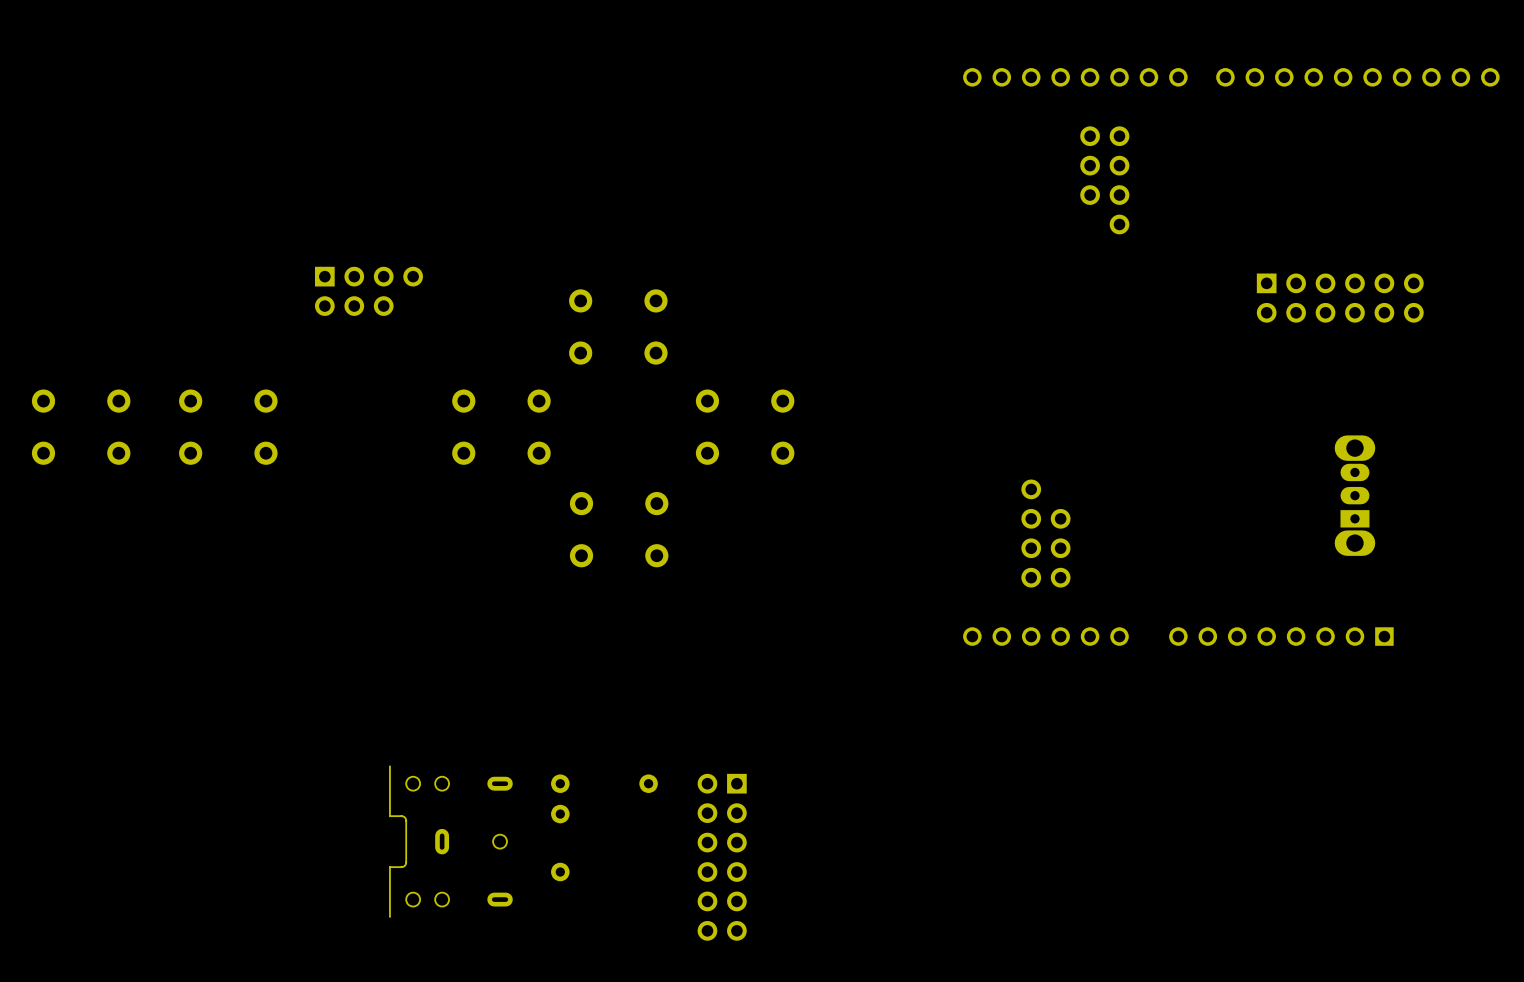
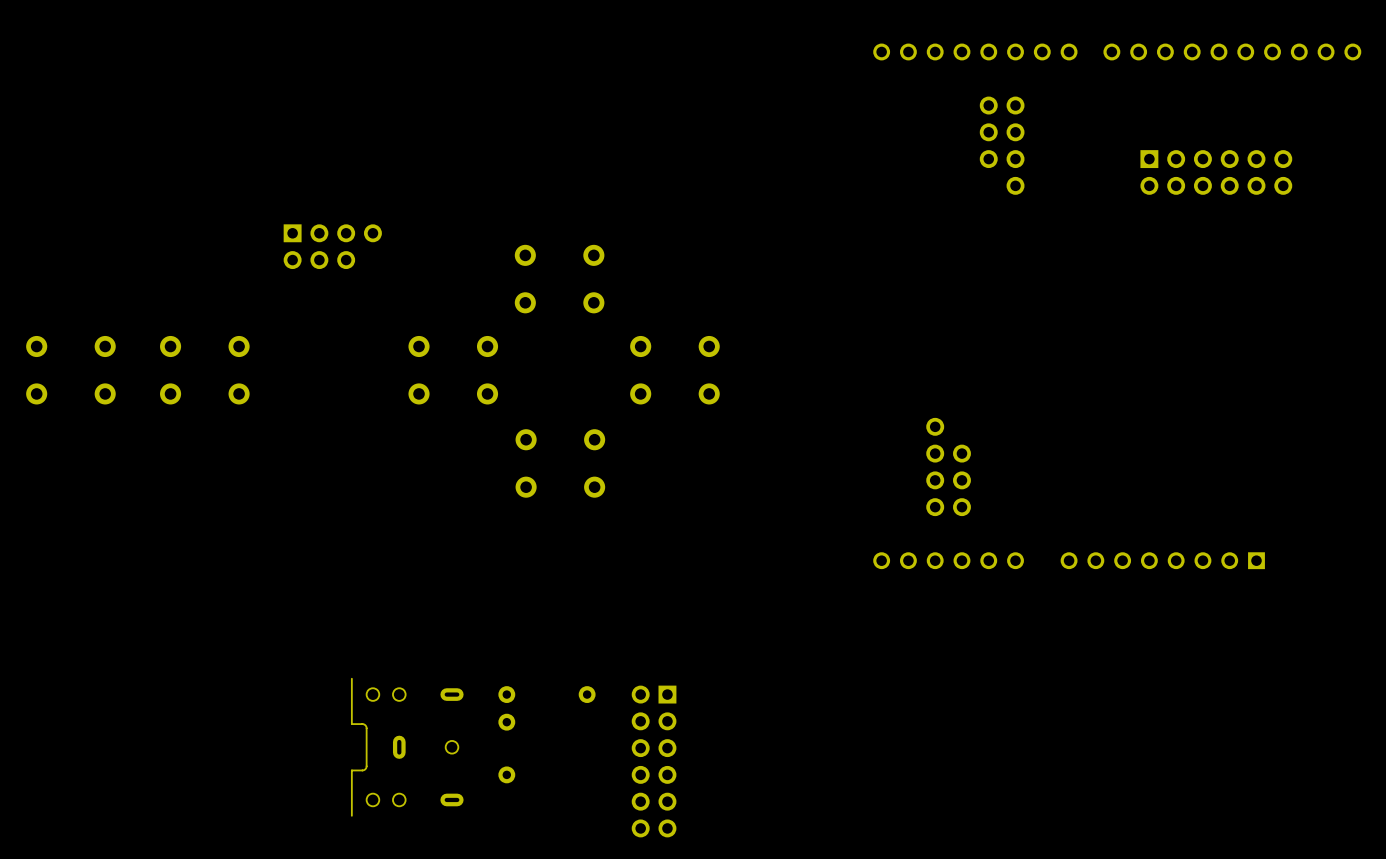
part position: (1340, 298) -> (1216, 172)
part: (1354, 495) -> none

